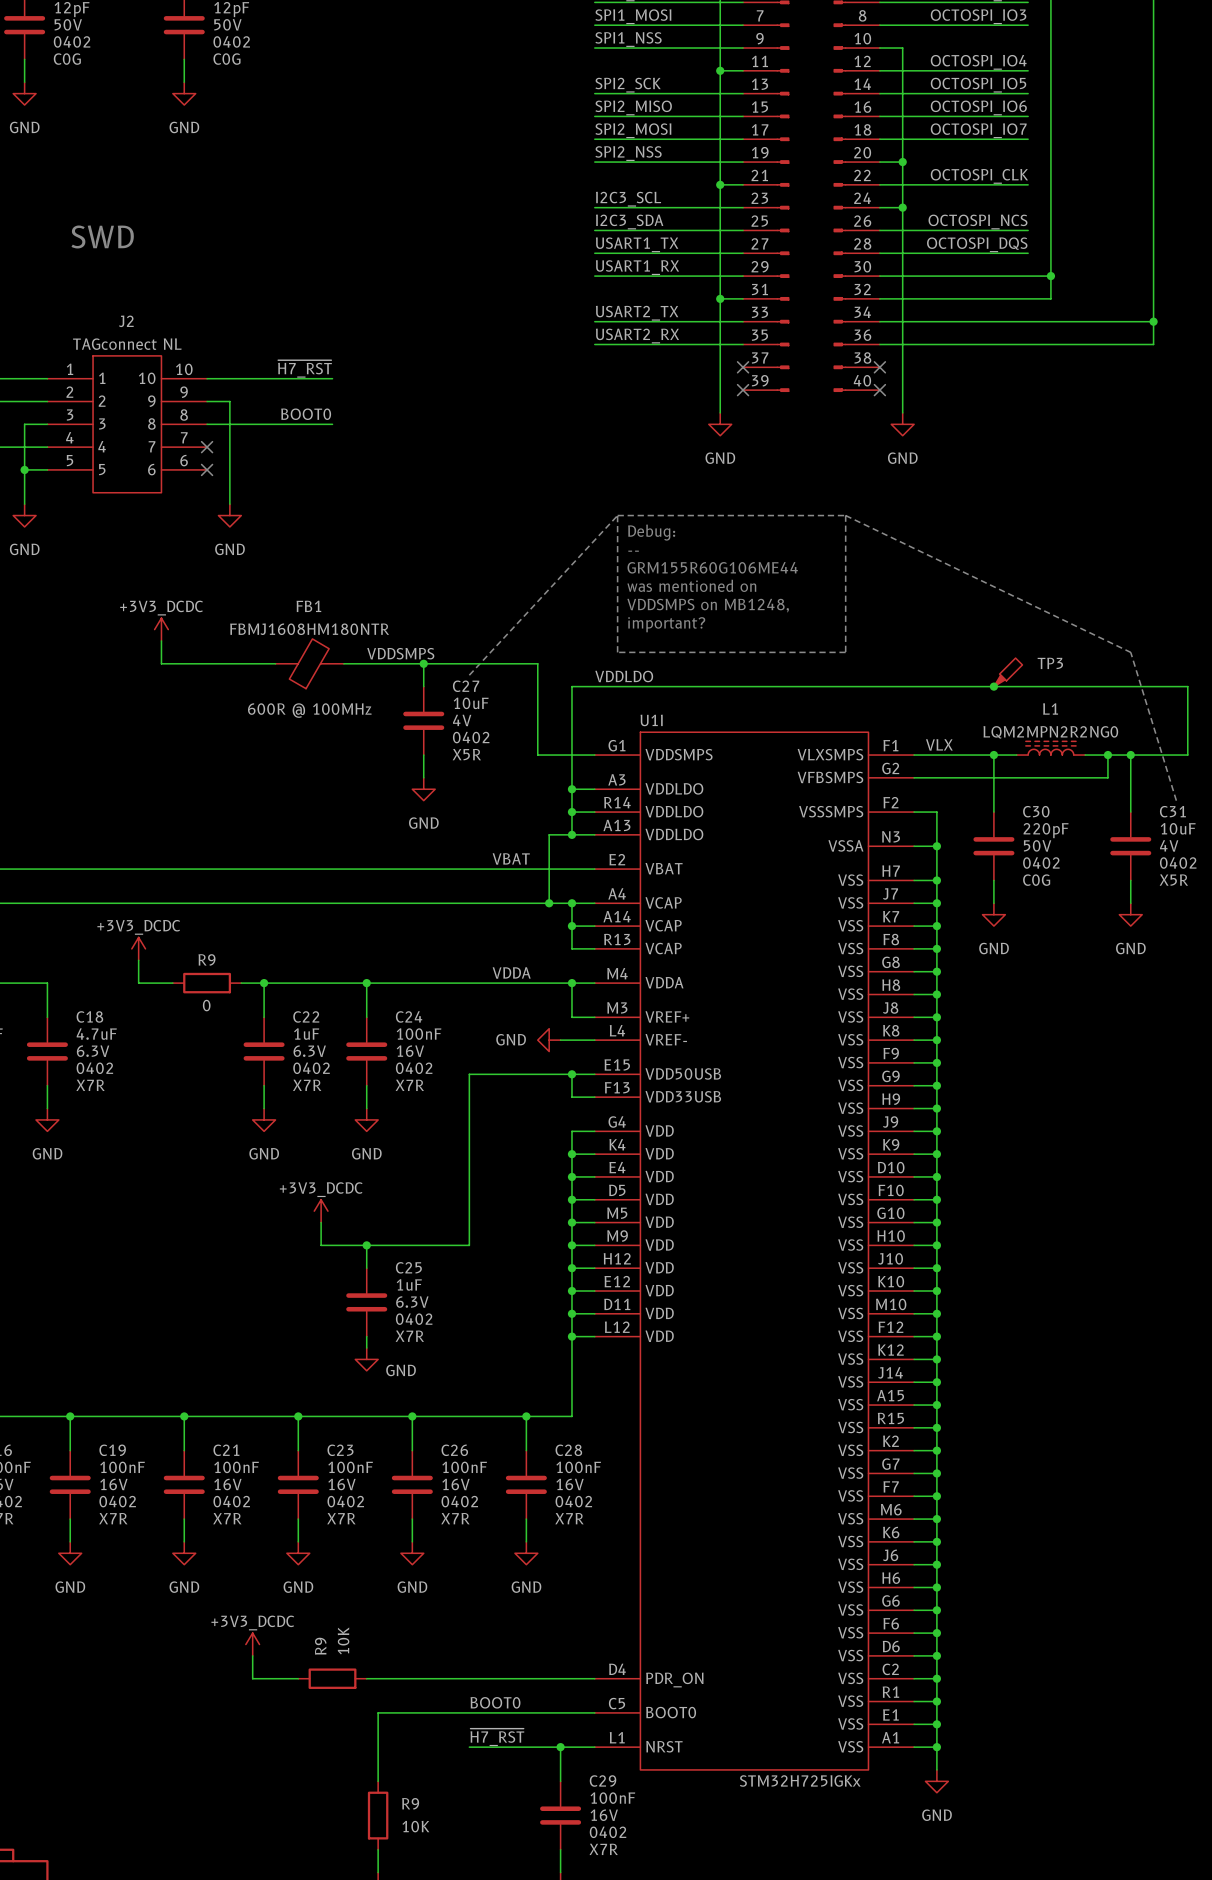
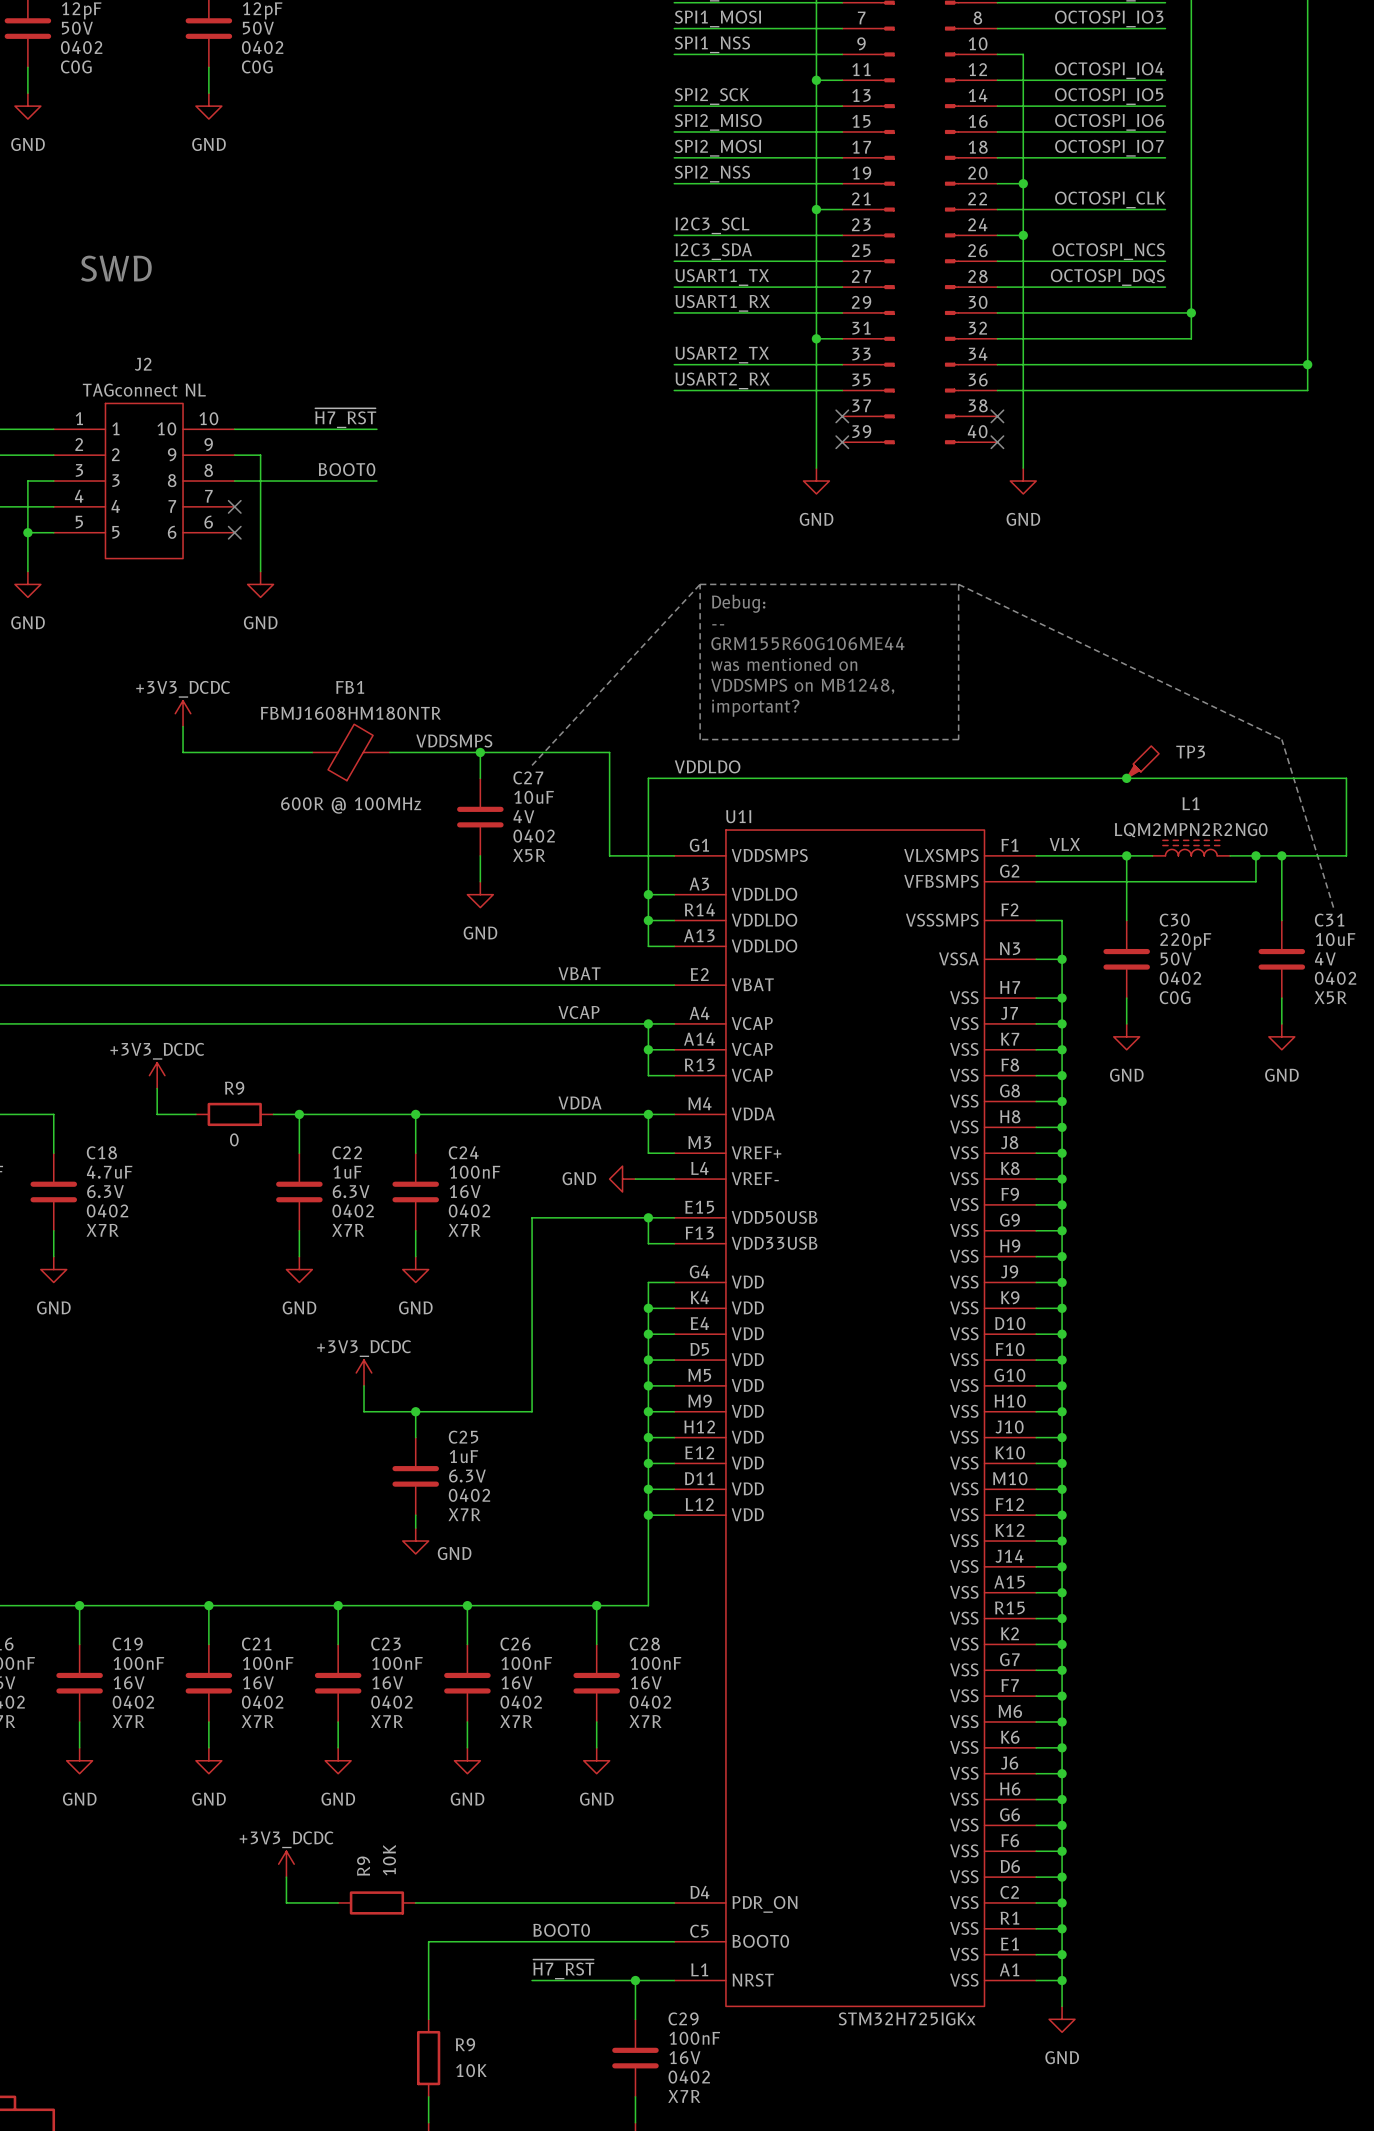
wire: (571, 834) (549, 834) (549, 903) -> none
junction: (571, 834) -> none
label: none -> VCAP (578, 1012)
junction: (549, 903) -> none

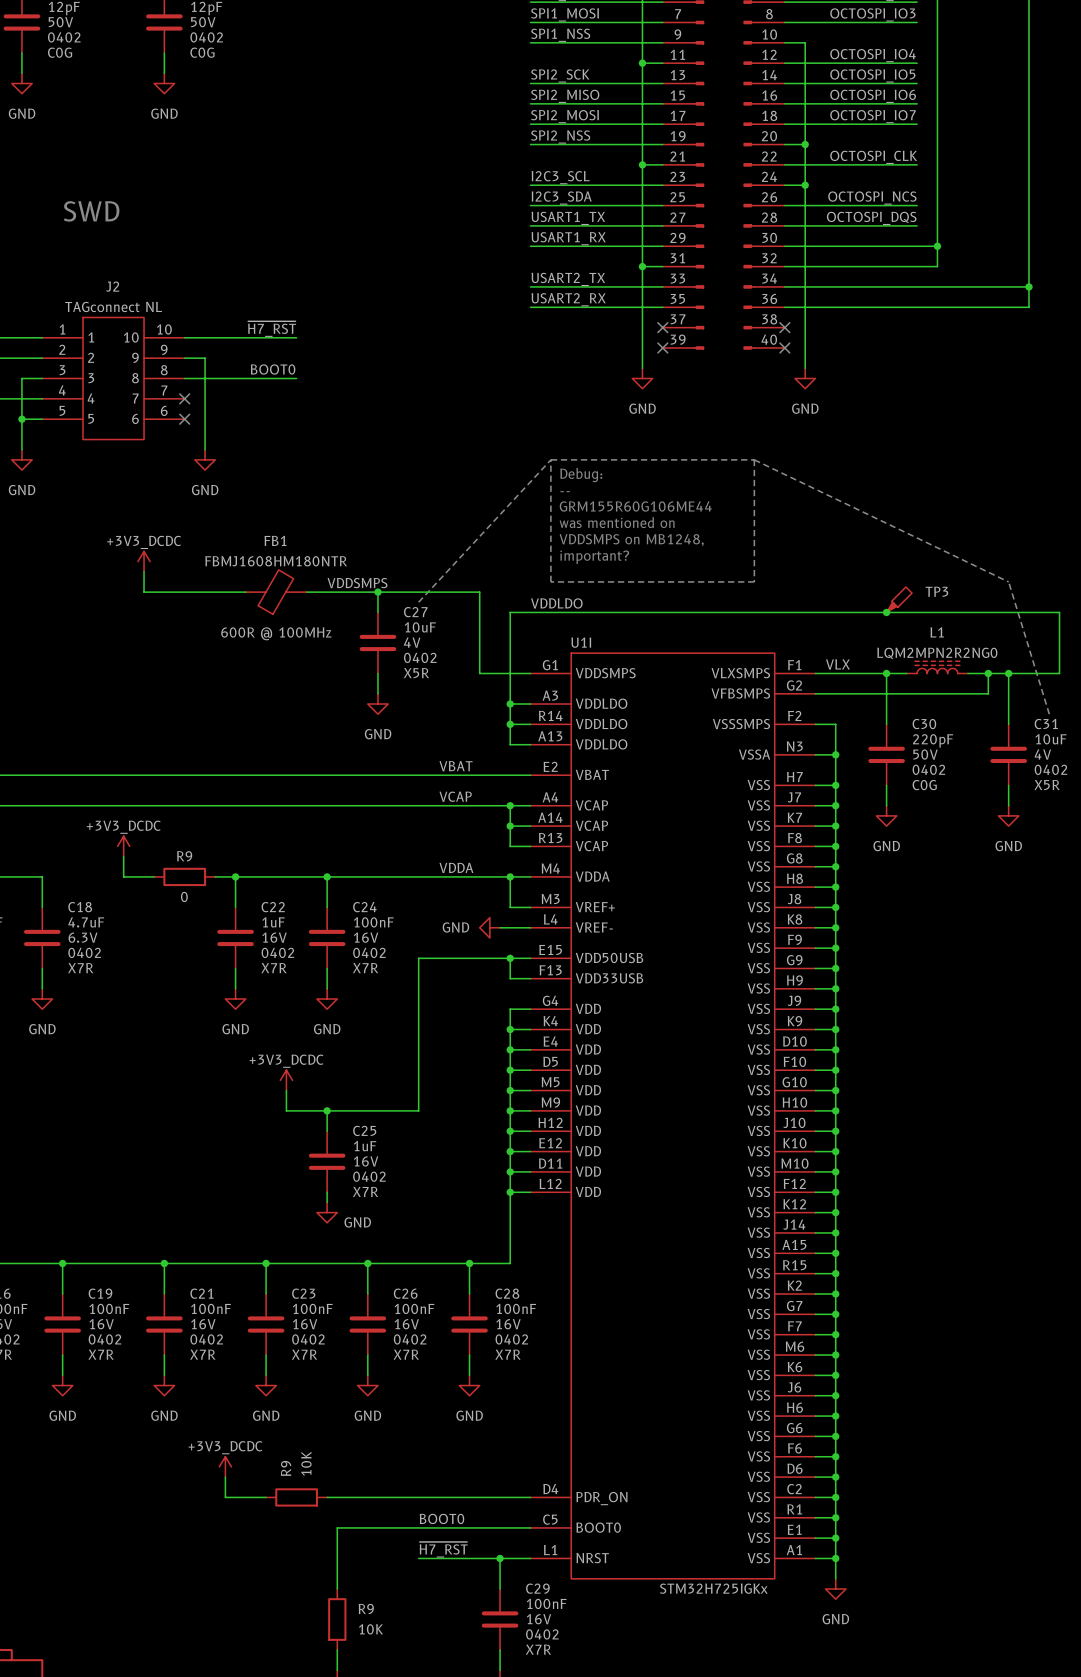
C22 text: 6.3V (351, 1191) -> 16V (274, 937)
C25 text: 6.3V (467, 1475) -> 16V (366, 1161)

